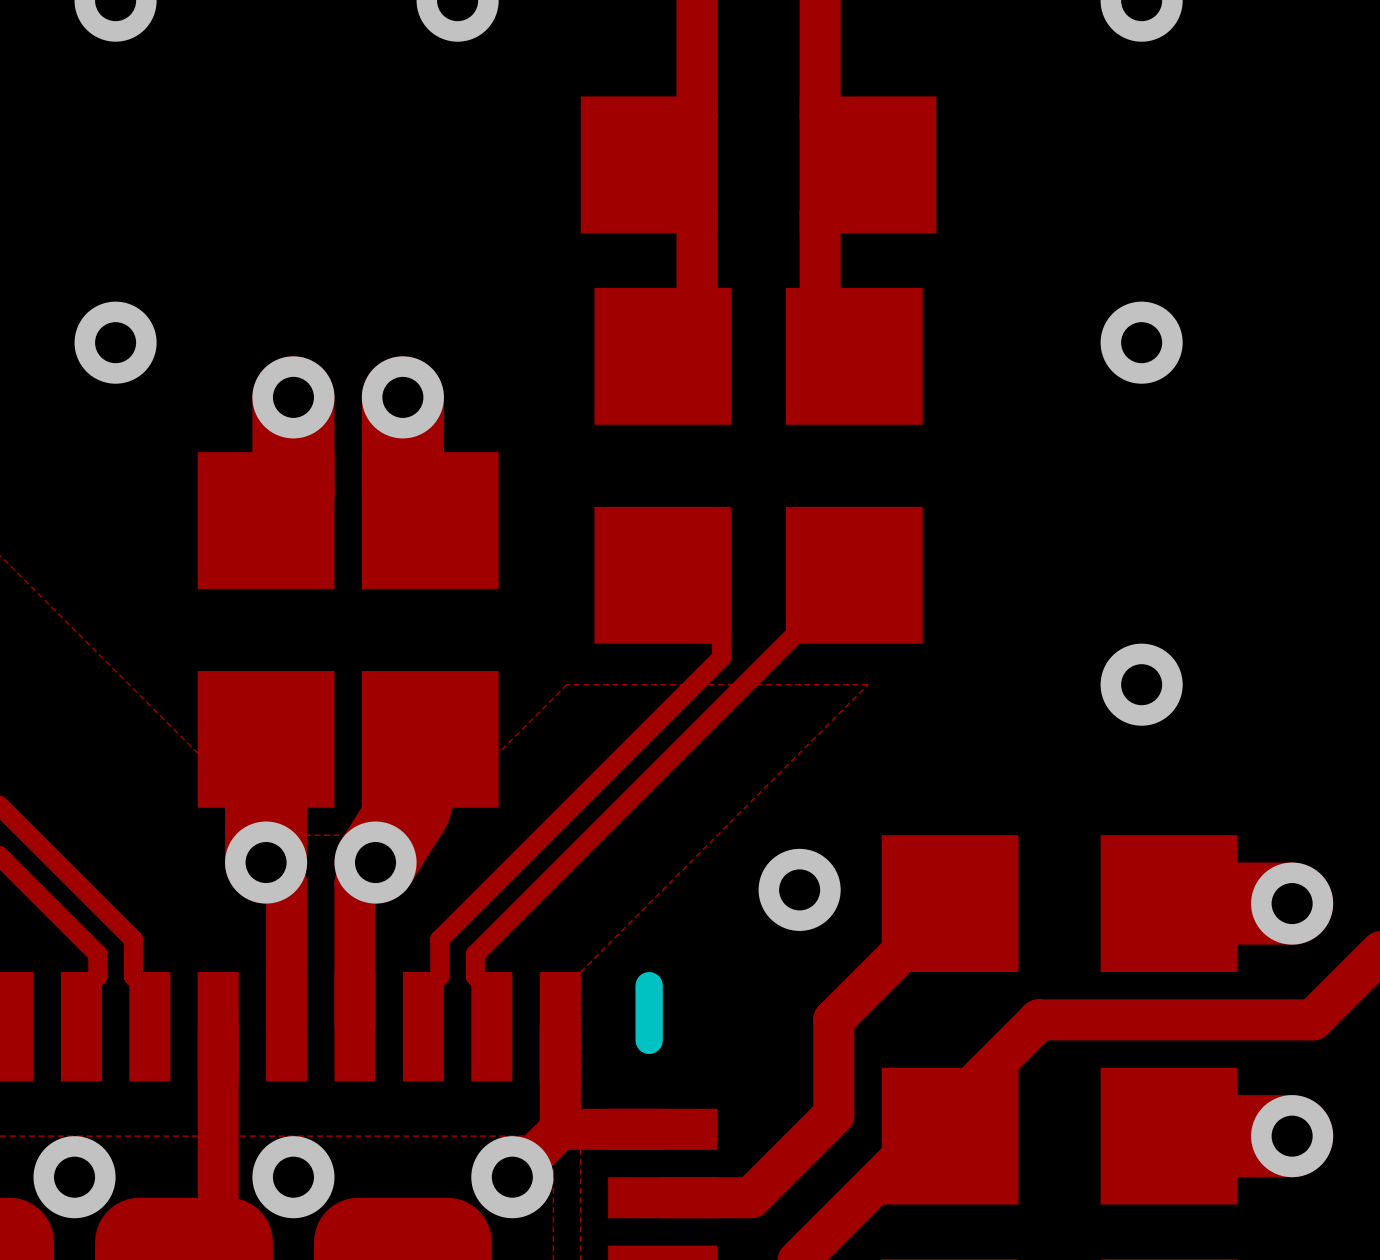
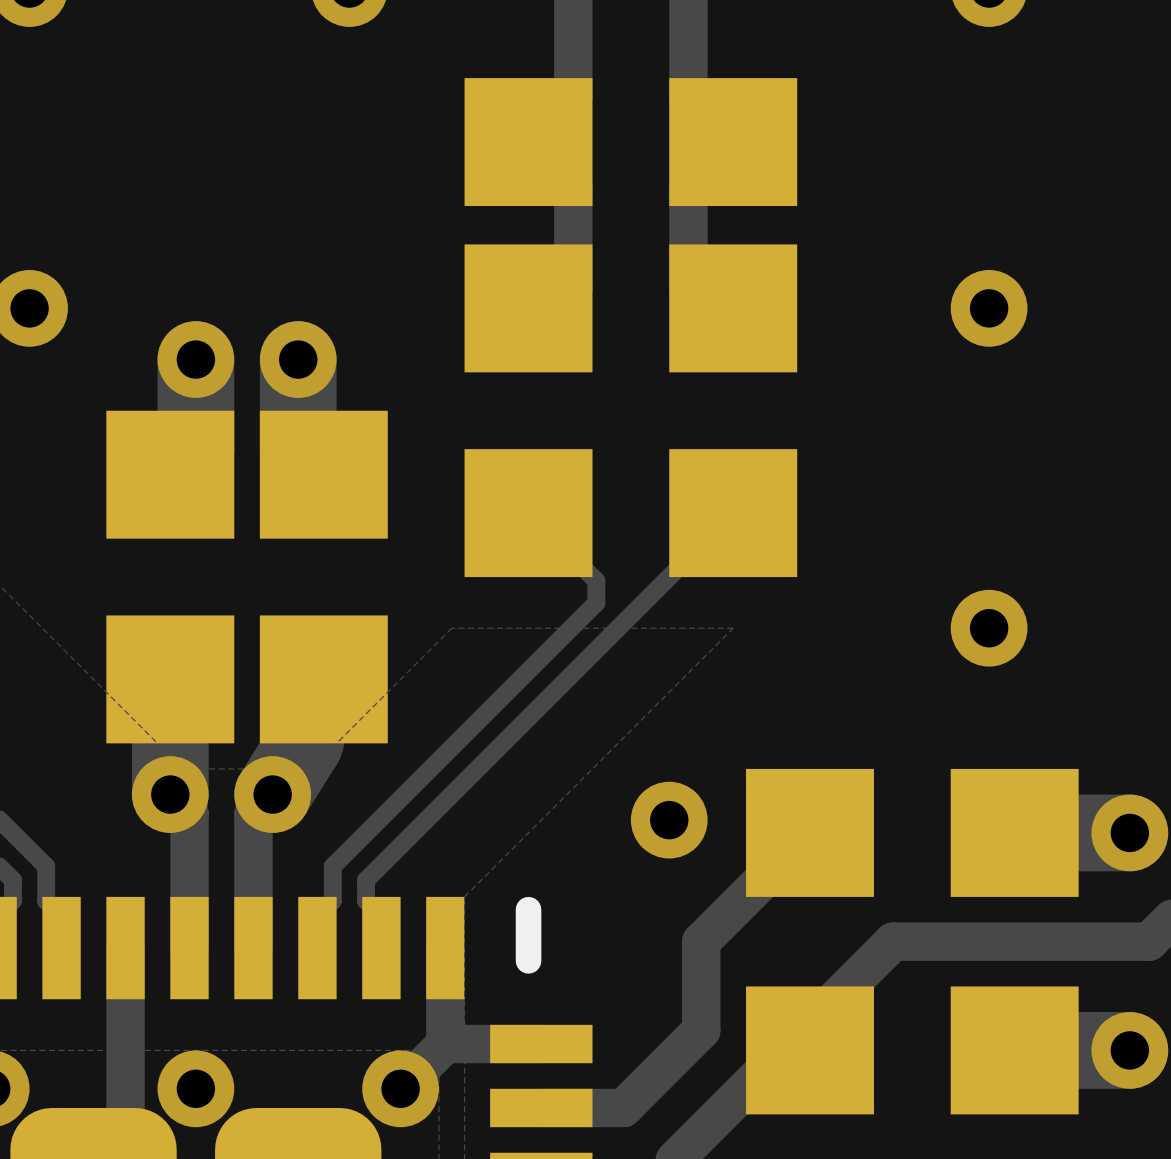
part position: (662, 465) -> (528, 410)
part position: (854, 465) -> (733, 410)

